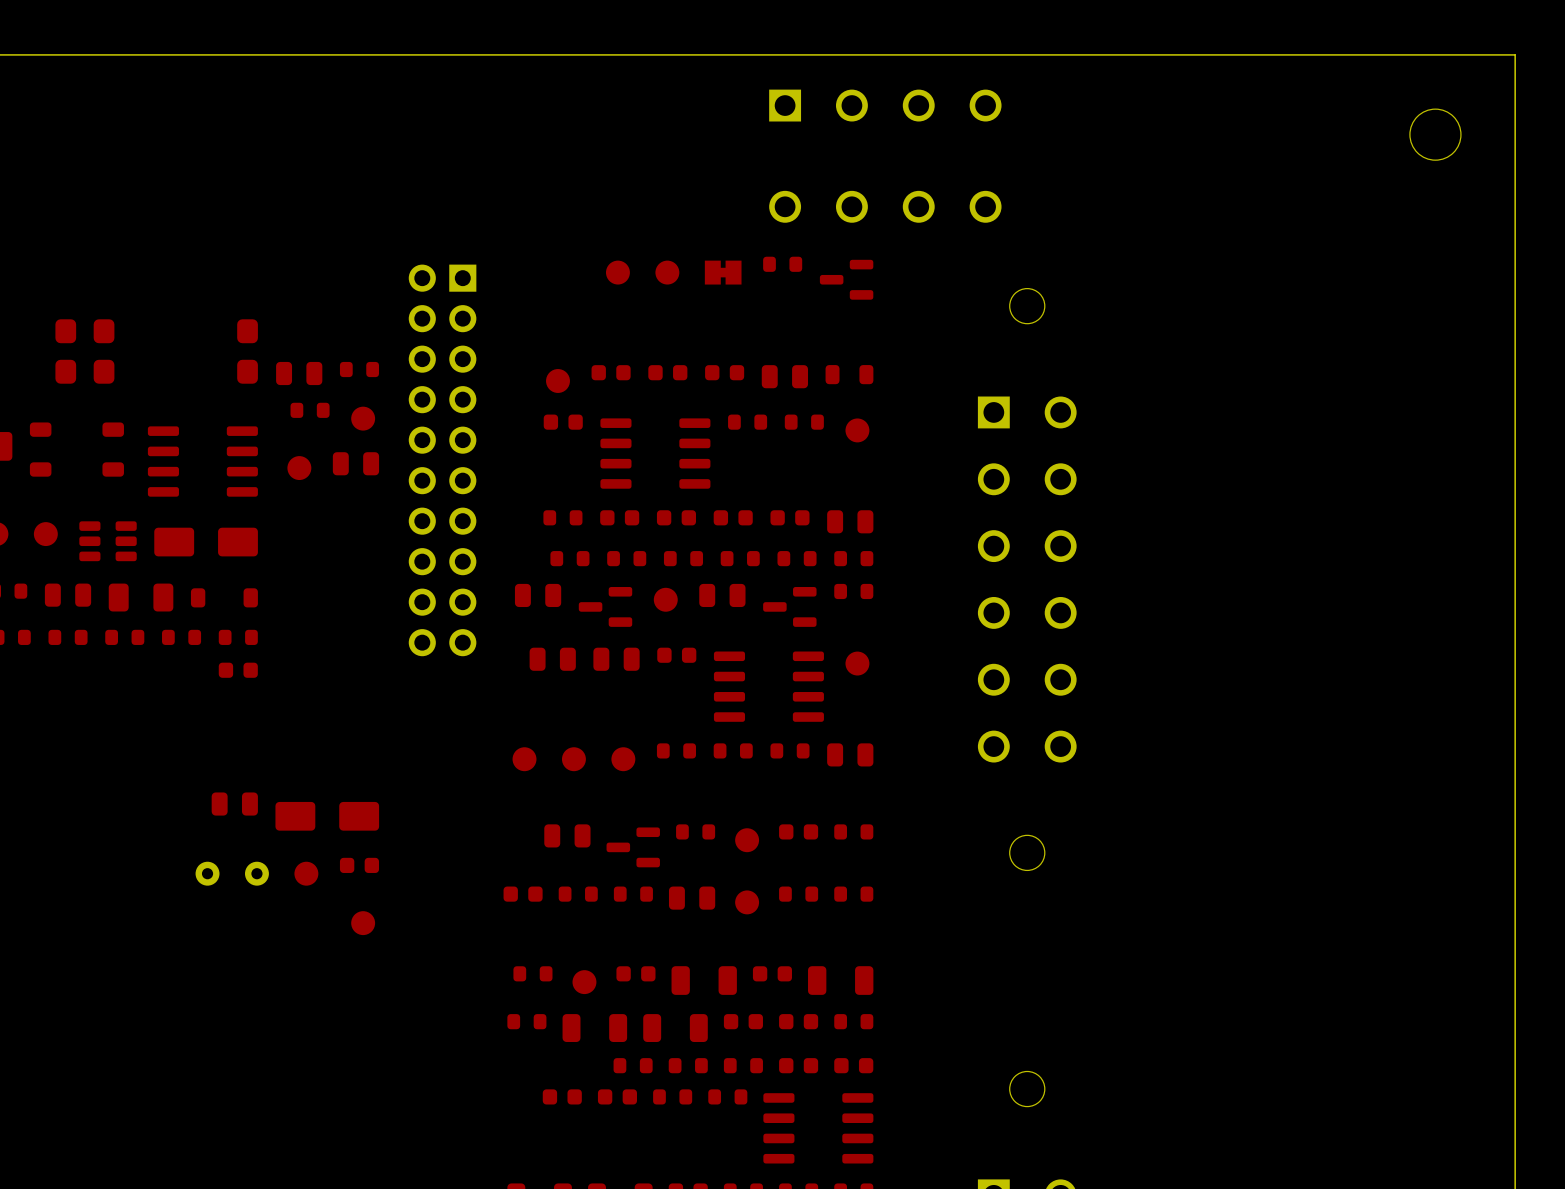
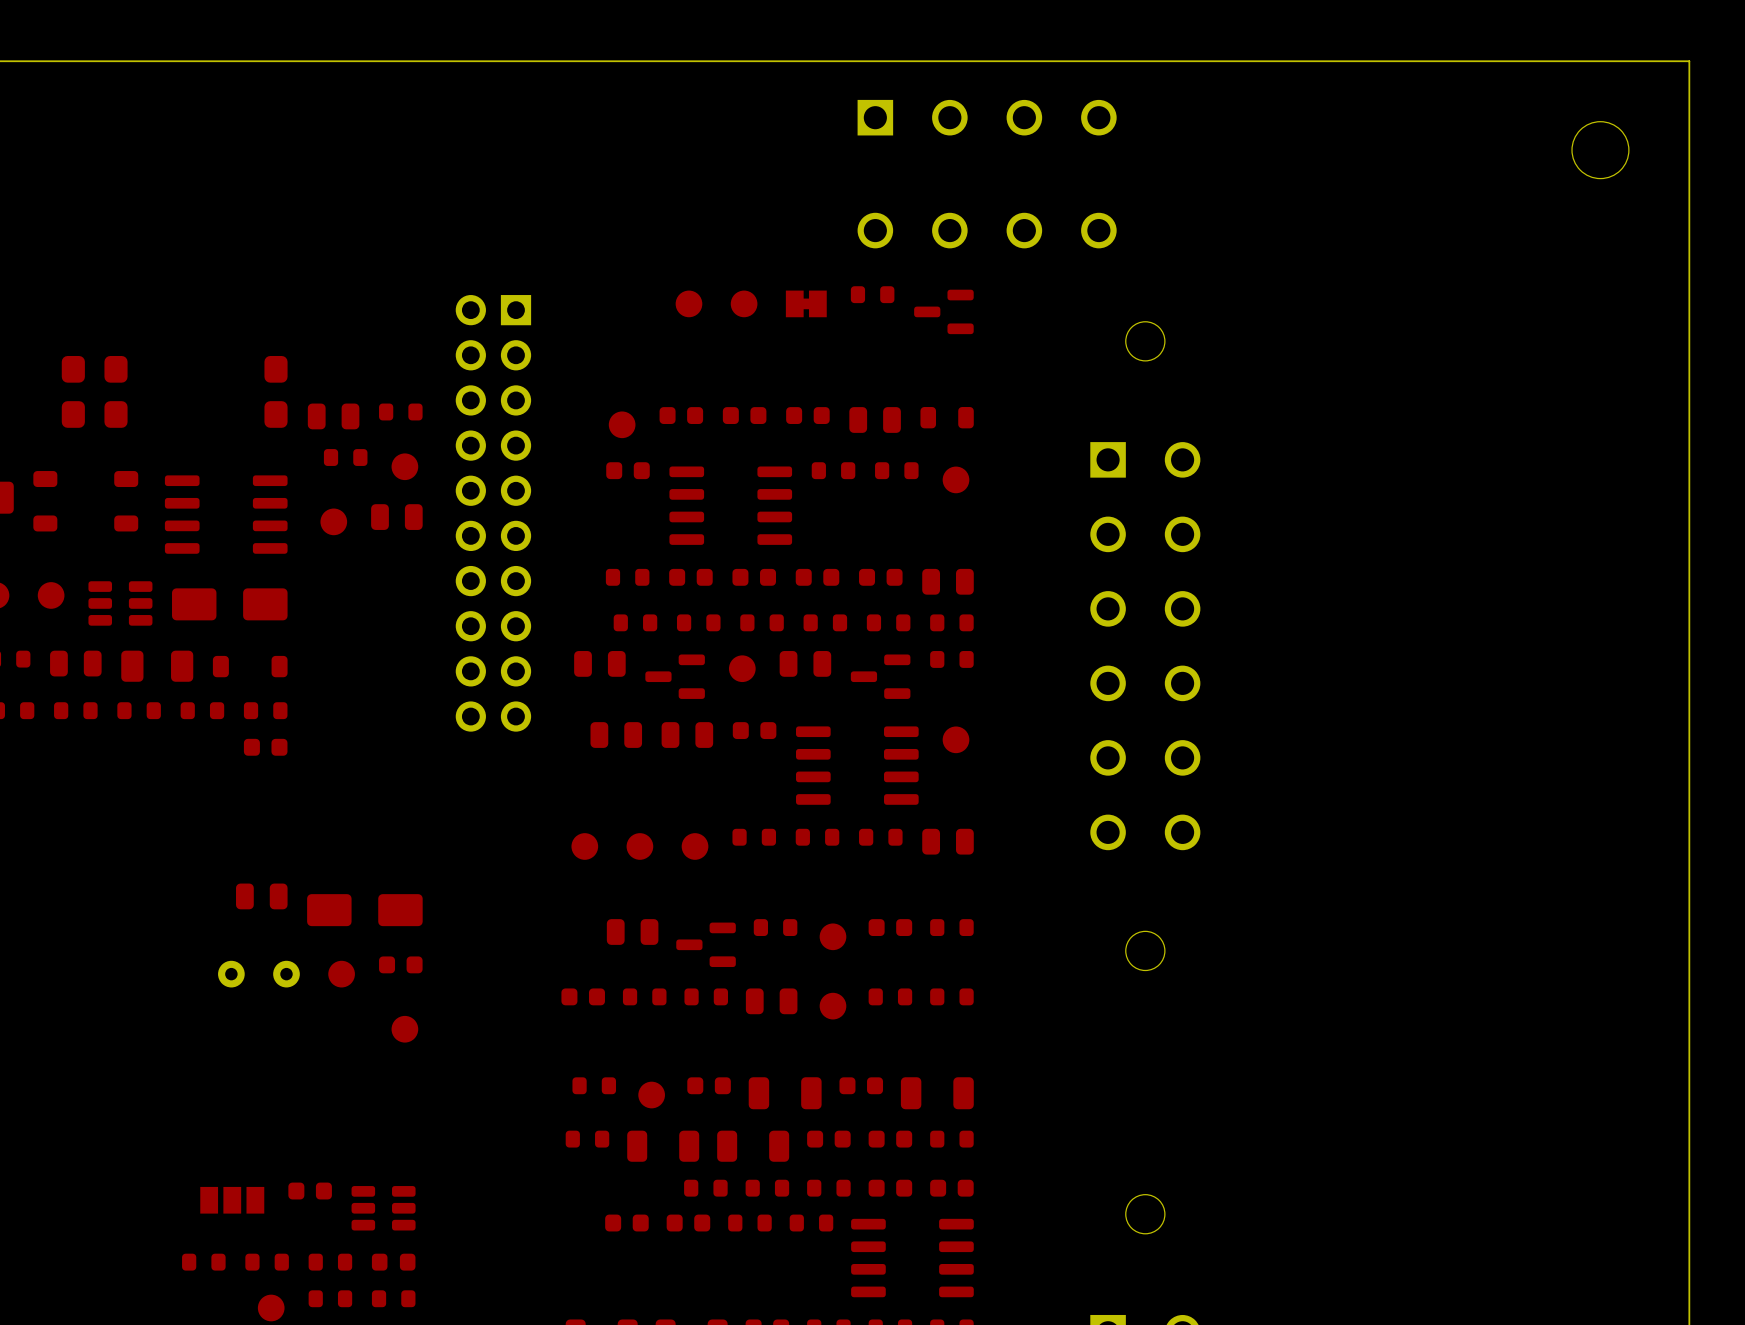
part: none -> (310, 1191)
part: none -> (232, 1200)
part: none -> (383, 1208)
part: none -> (203, 1262)
part: none -> (267, 1262)
part: none -> (330, 1262)
part: none -> (393, 1262)
part: none -> (330, 1298)
part: none -> (393, 1298)
part: none -> (271, 1307)

